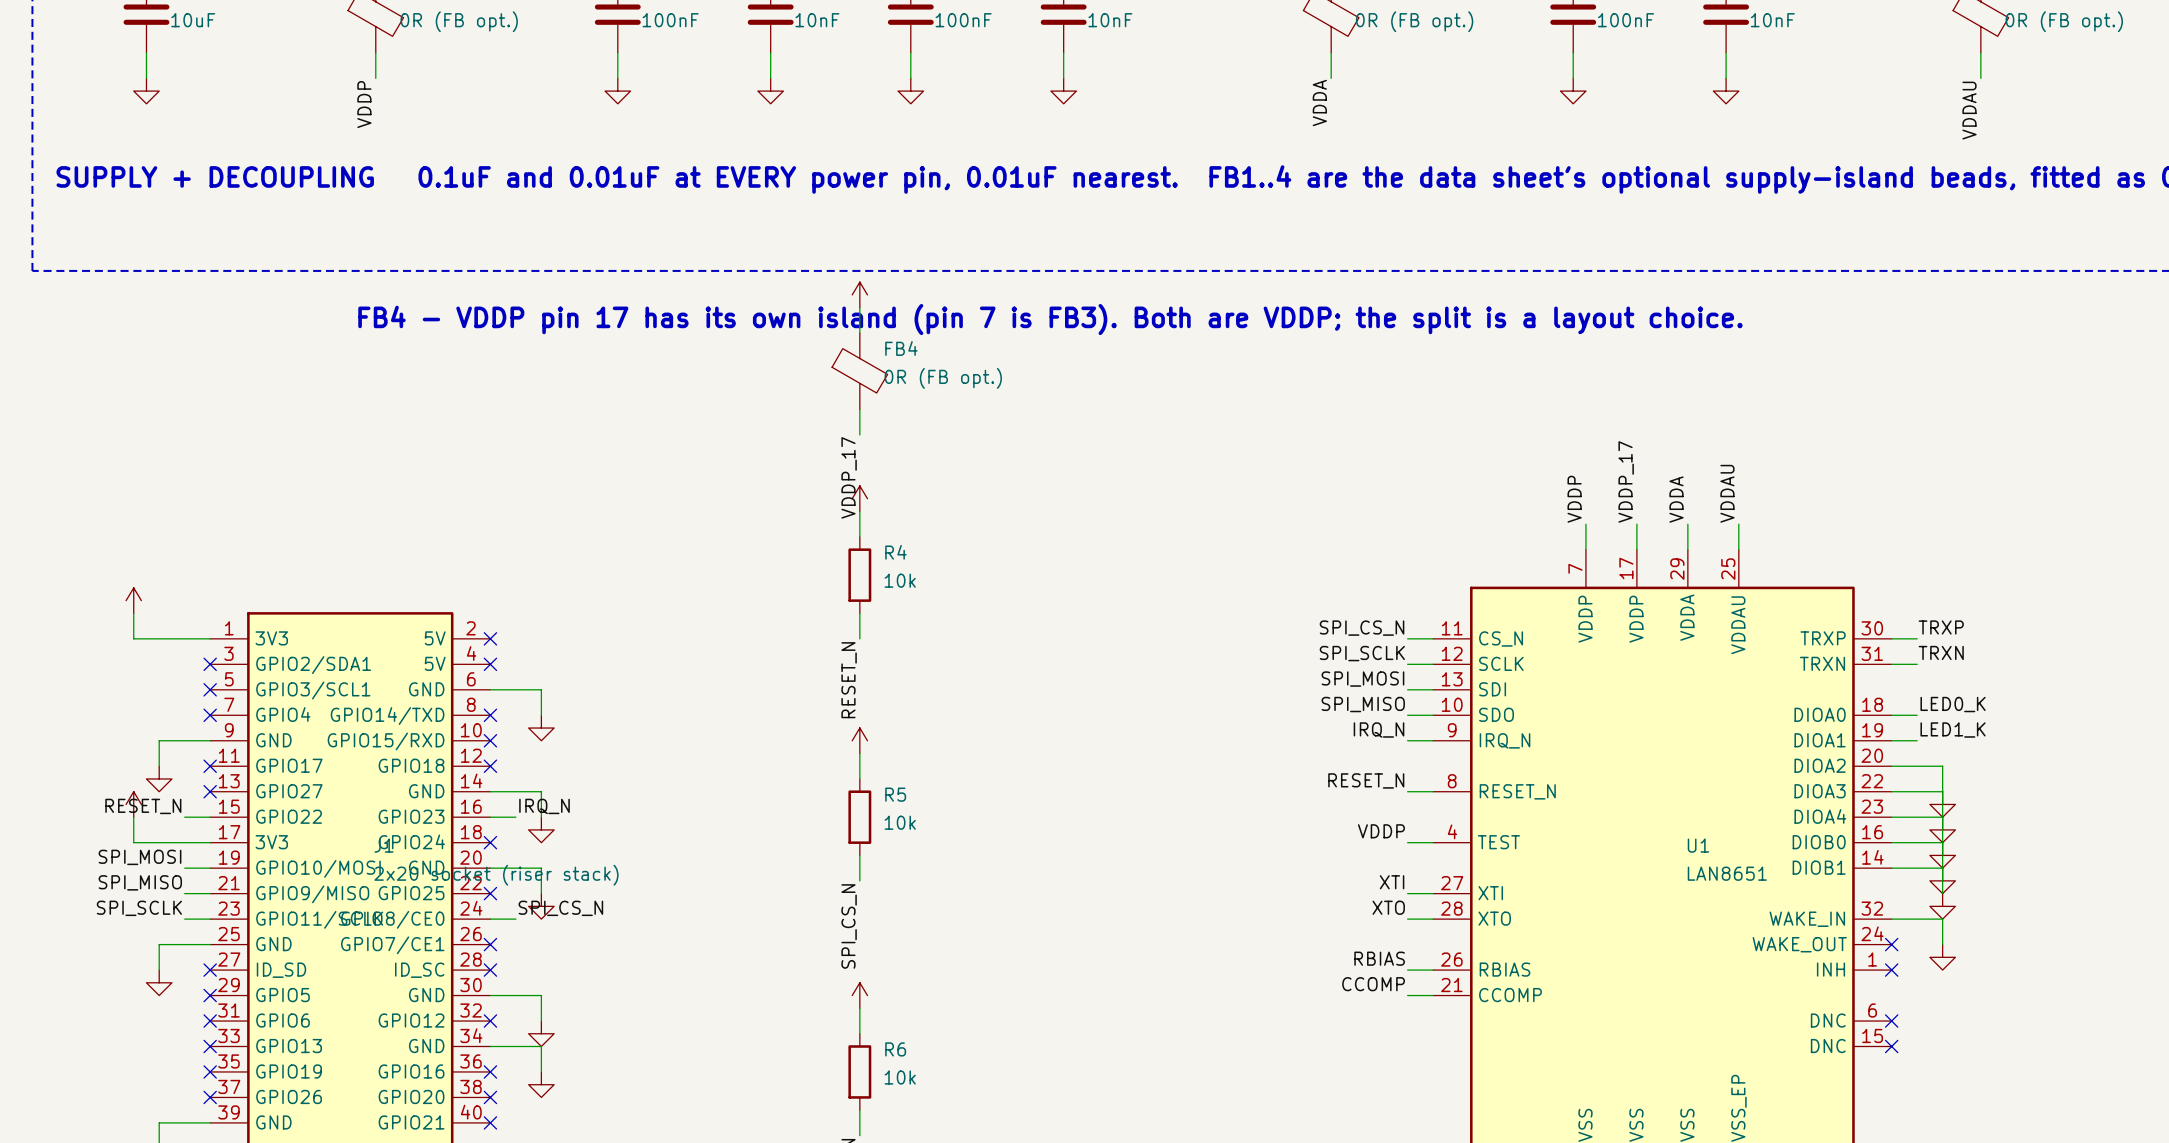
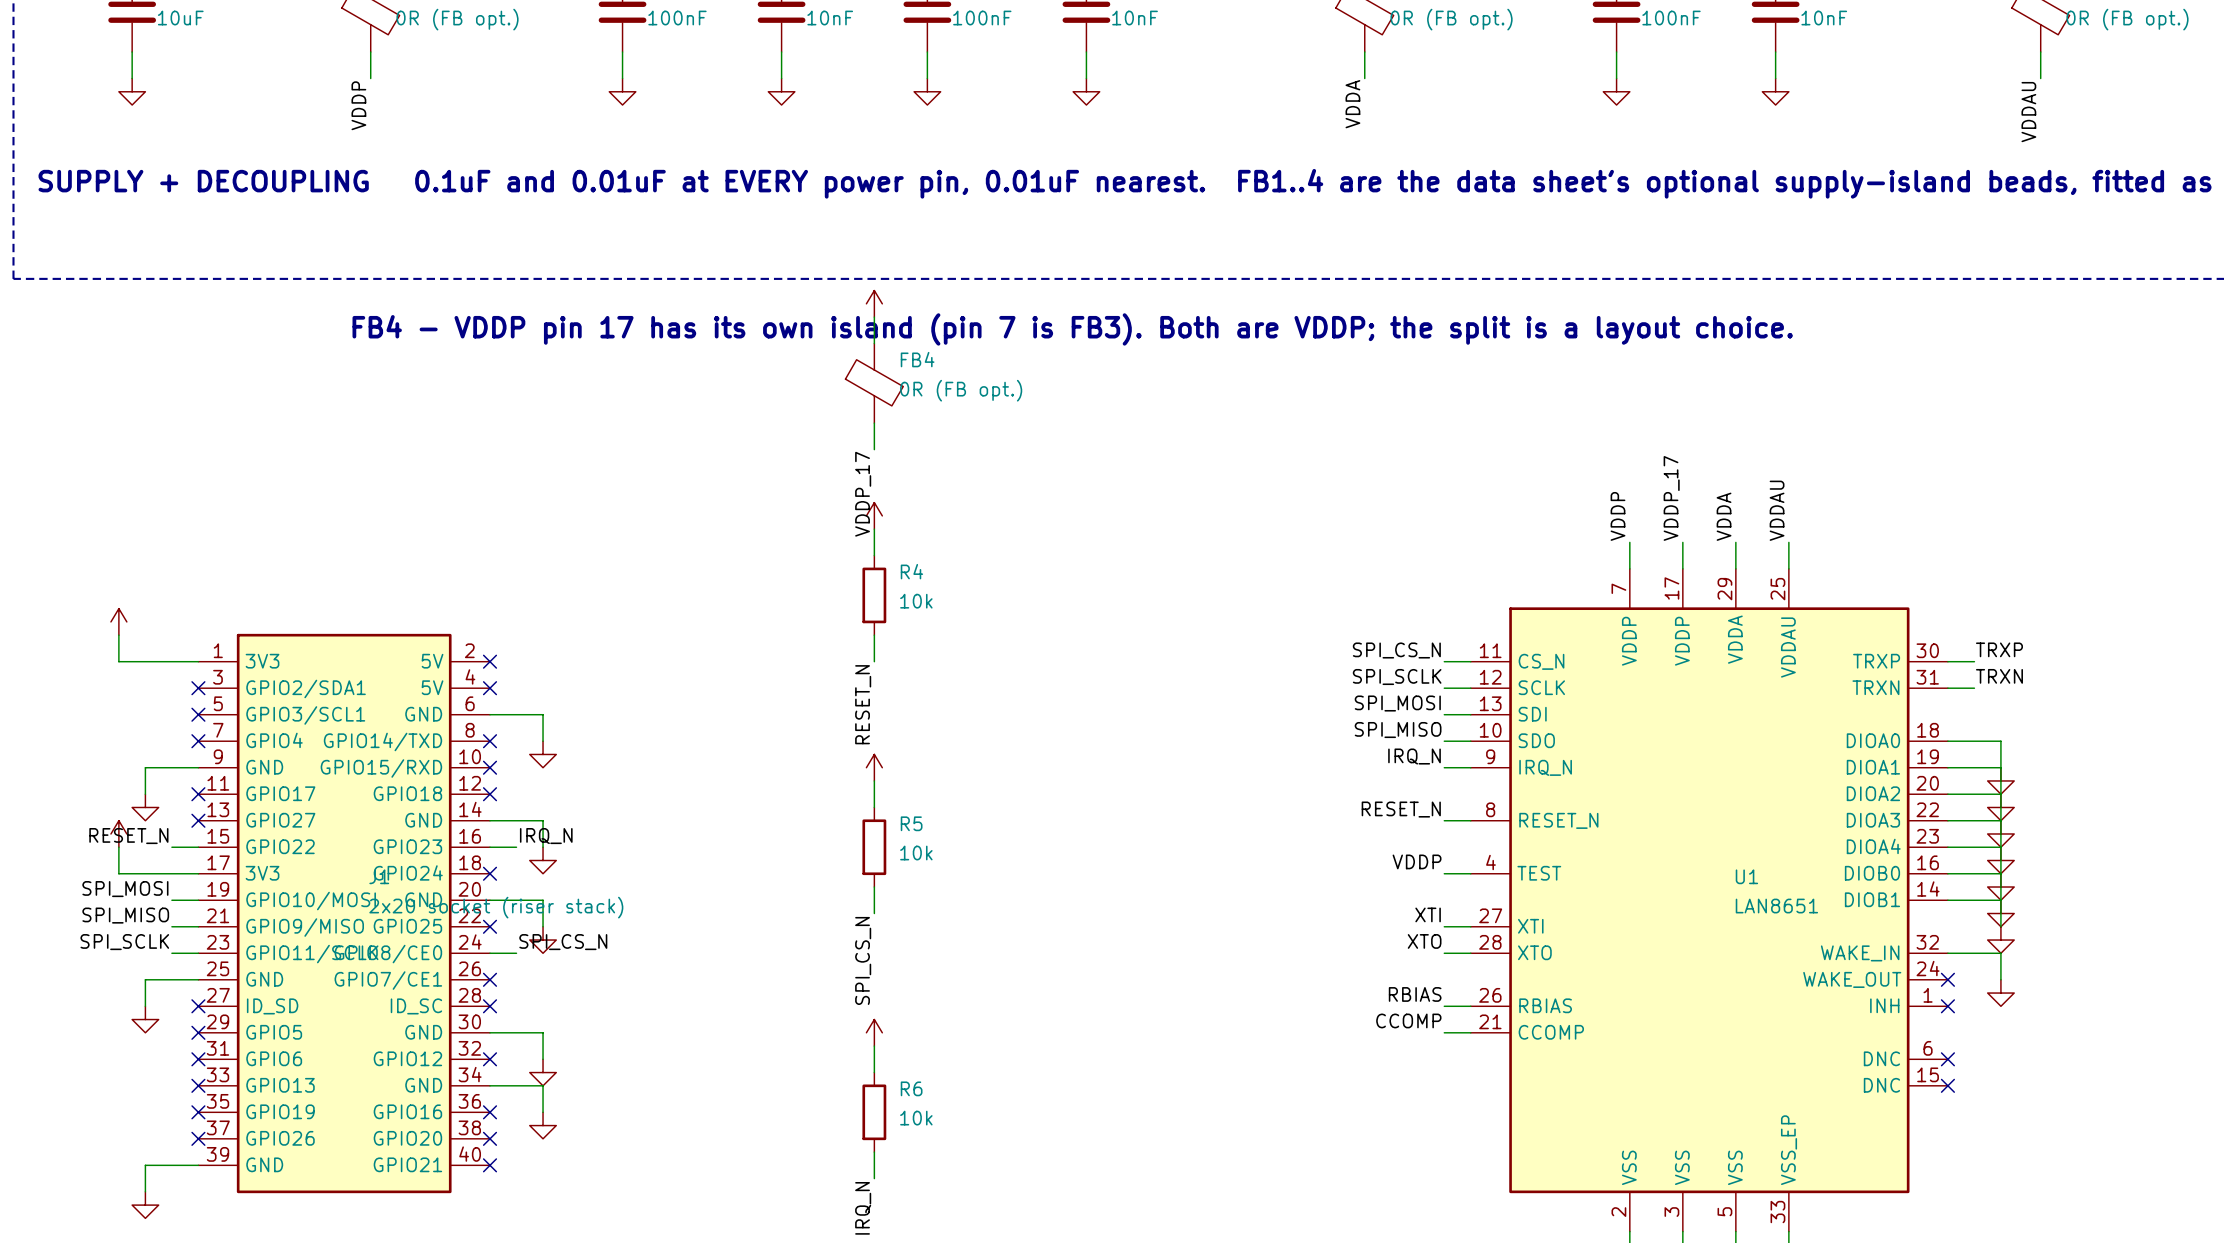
label: LED0_K (1953, 704) -> none
wire: none -> (1974, 741) (2000, 741) (2000, 794)
label: LED1_K (1953, 730) -> none
wire: none -> (1974, 767) (2000, 767)
power symbol: none -> (2000, 780)
power symbol: none -> (2000, 807)

